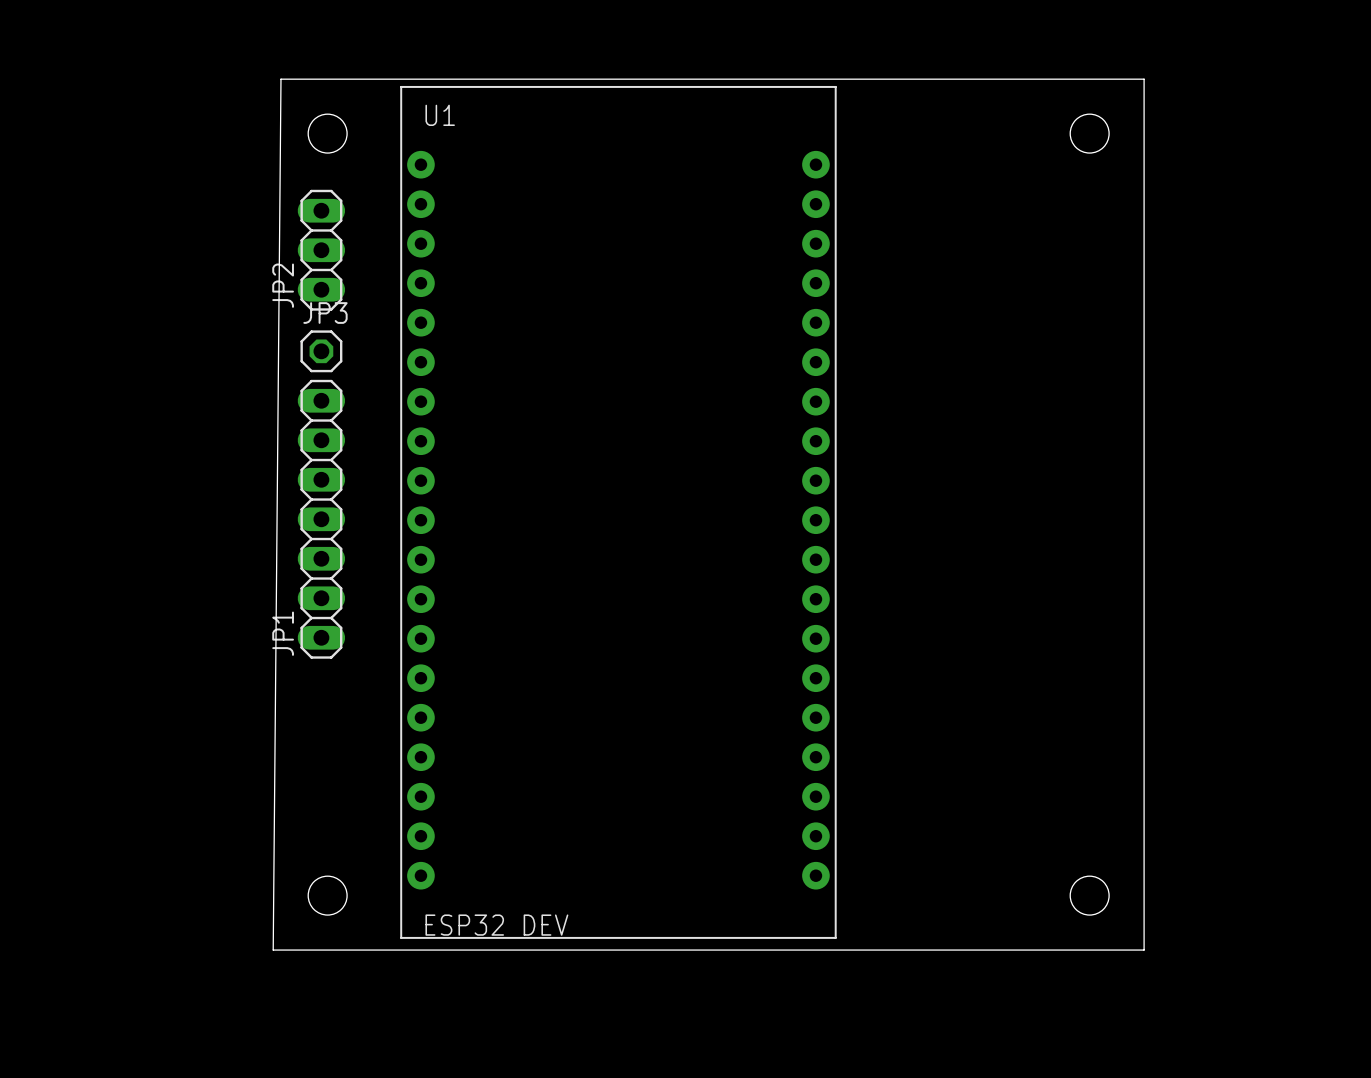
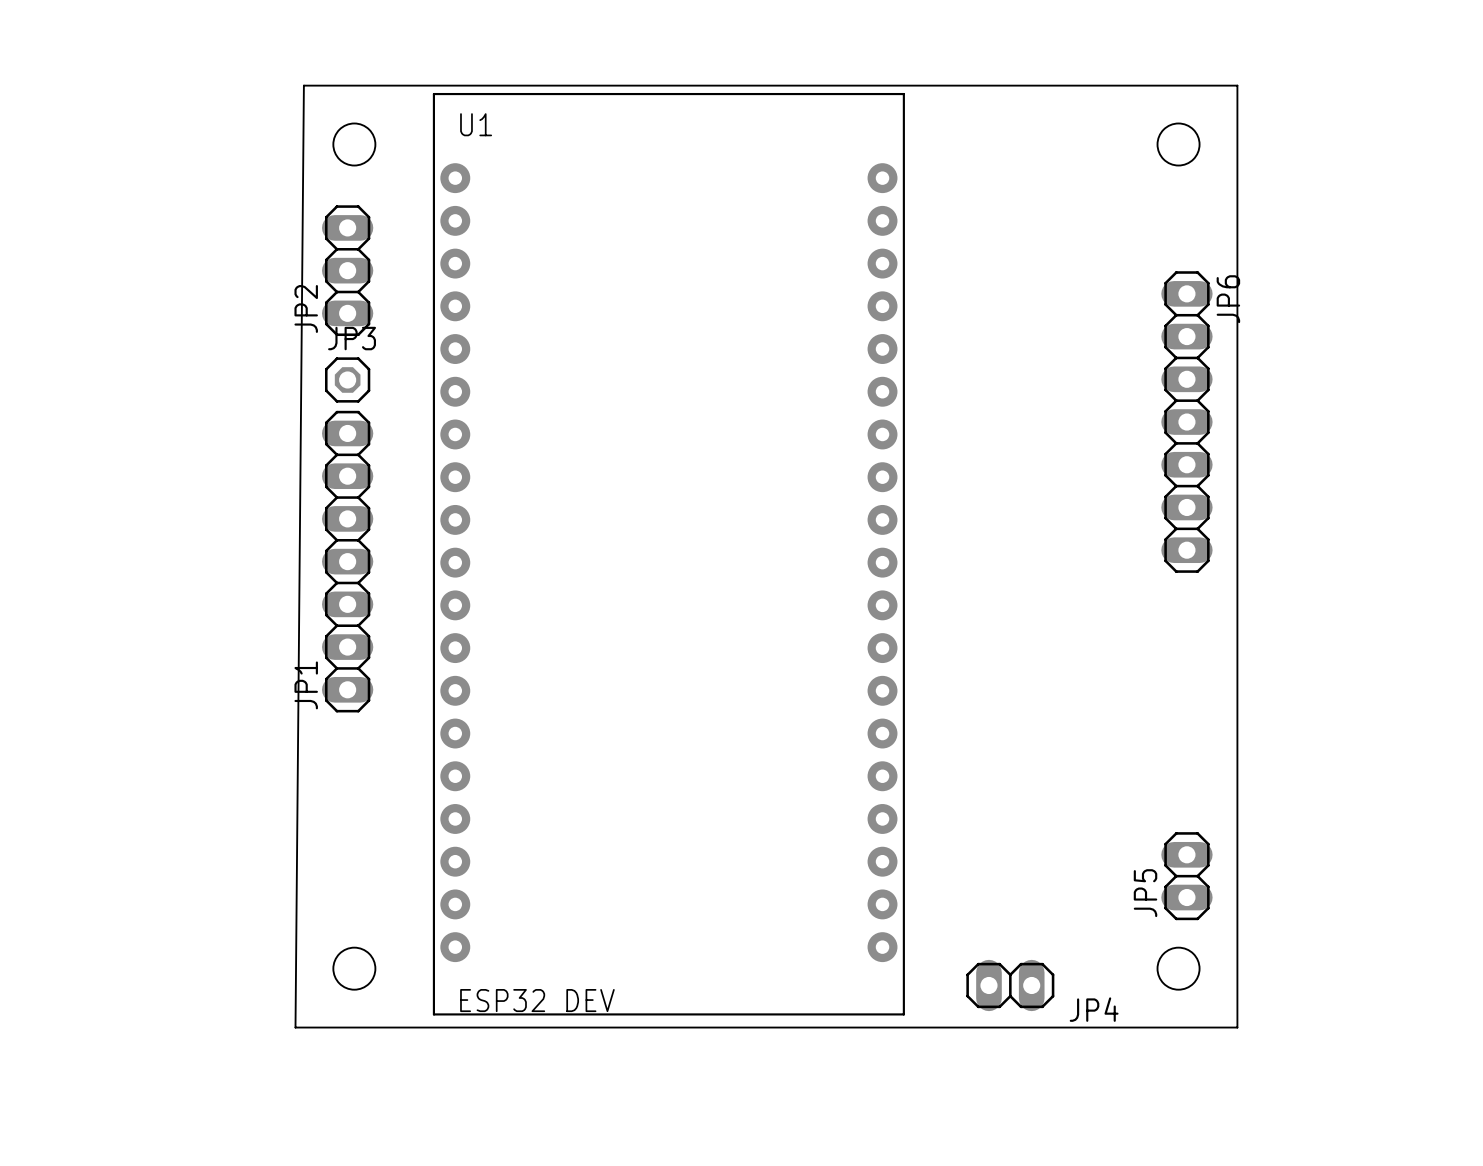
JP6: none -> (1186, 422)
JP5: none -> (1186, 876)
JP4: none -> (1010, 985)

